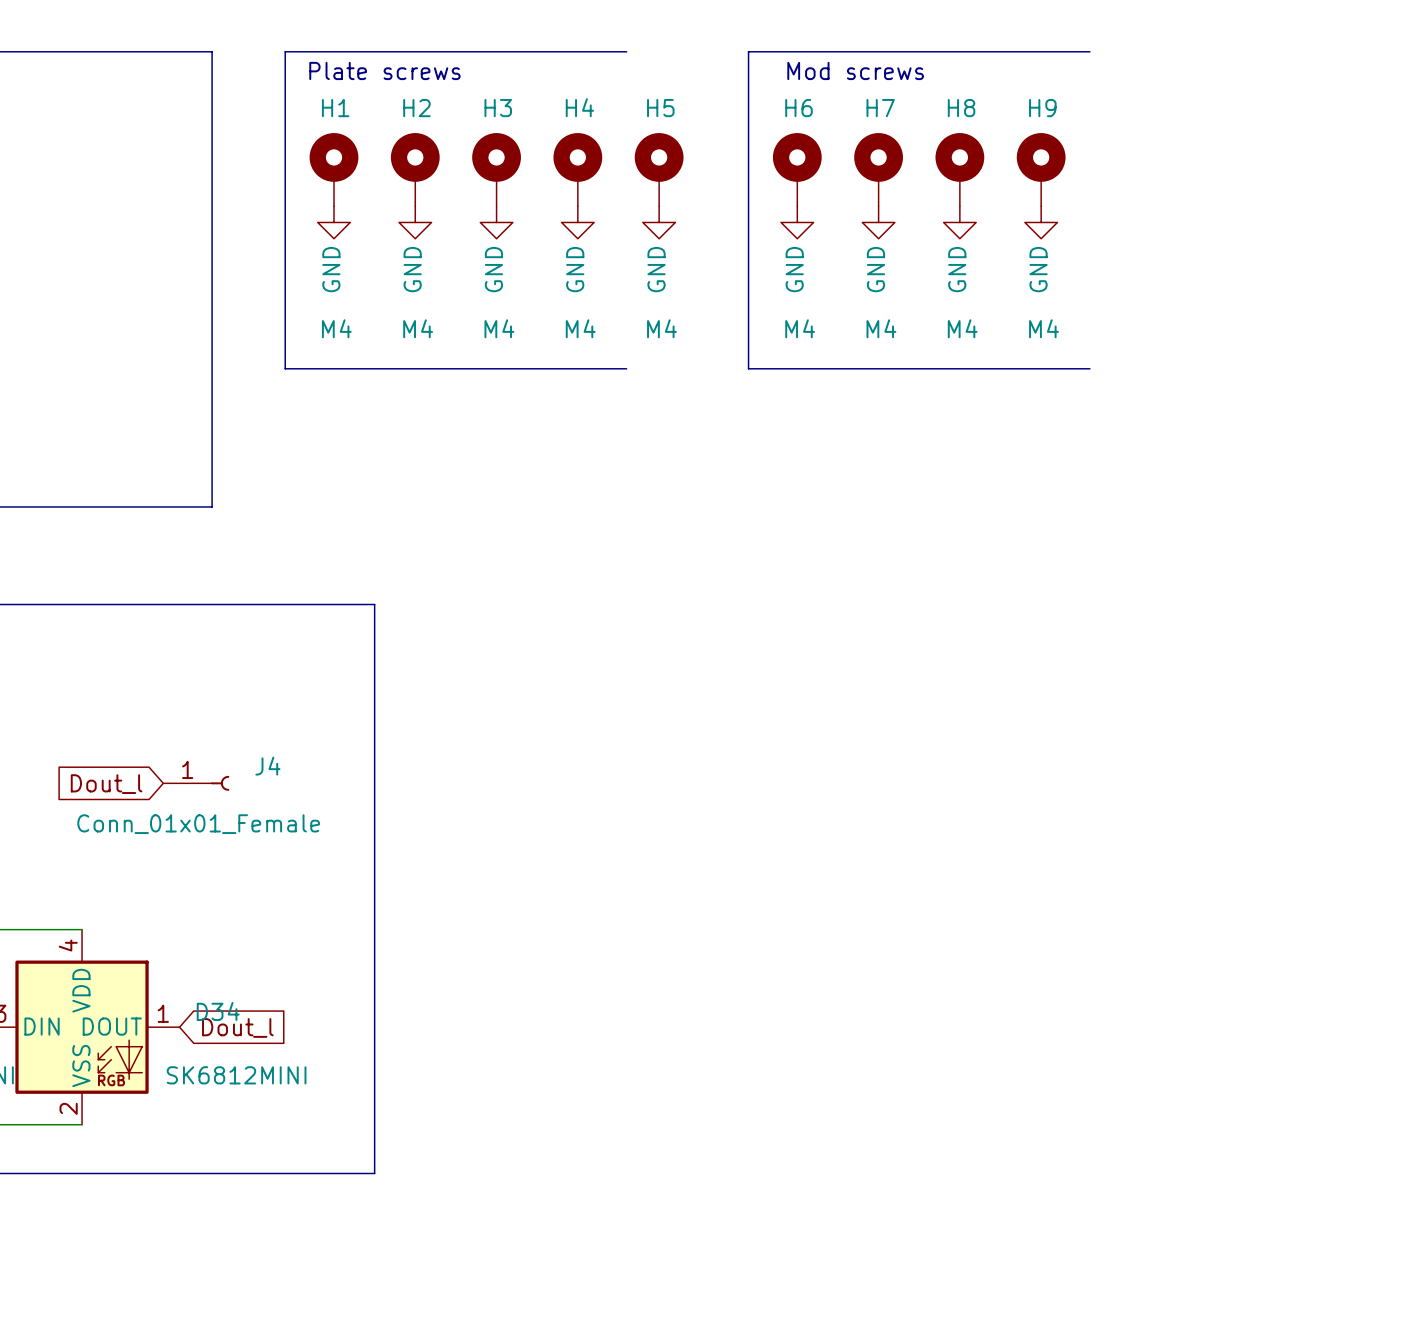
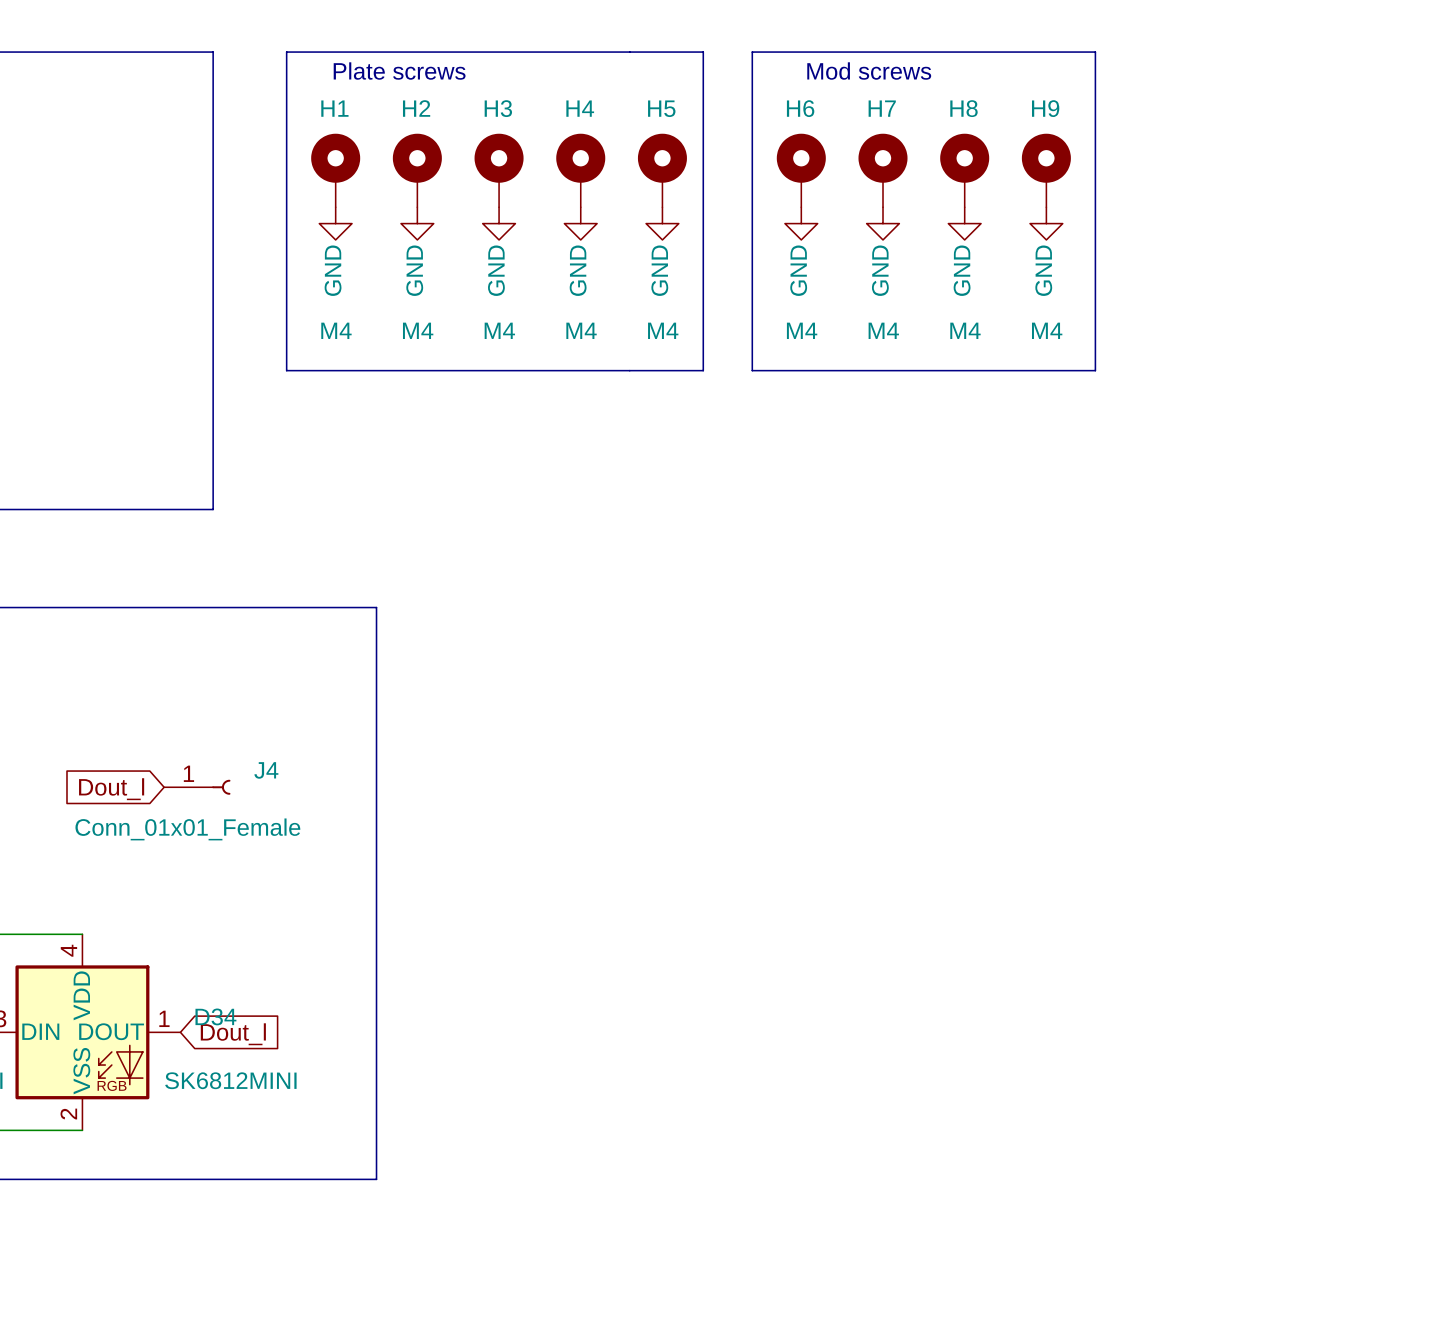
line: none -> (629, 52) (703, 52) (703, 370) (629, 370)
line: none -> (1095, 52) (1095, 370)

